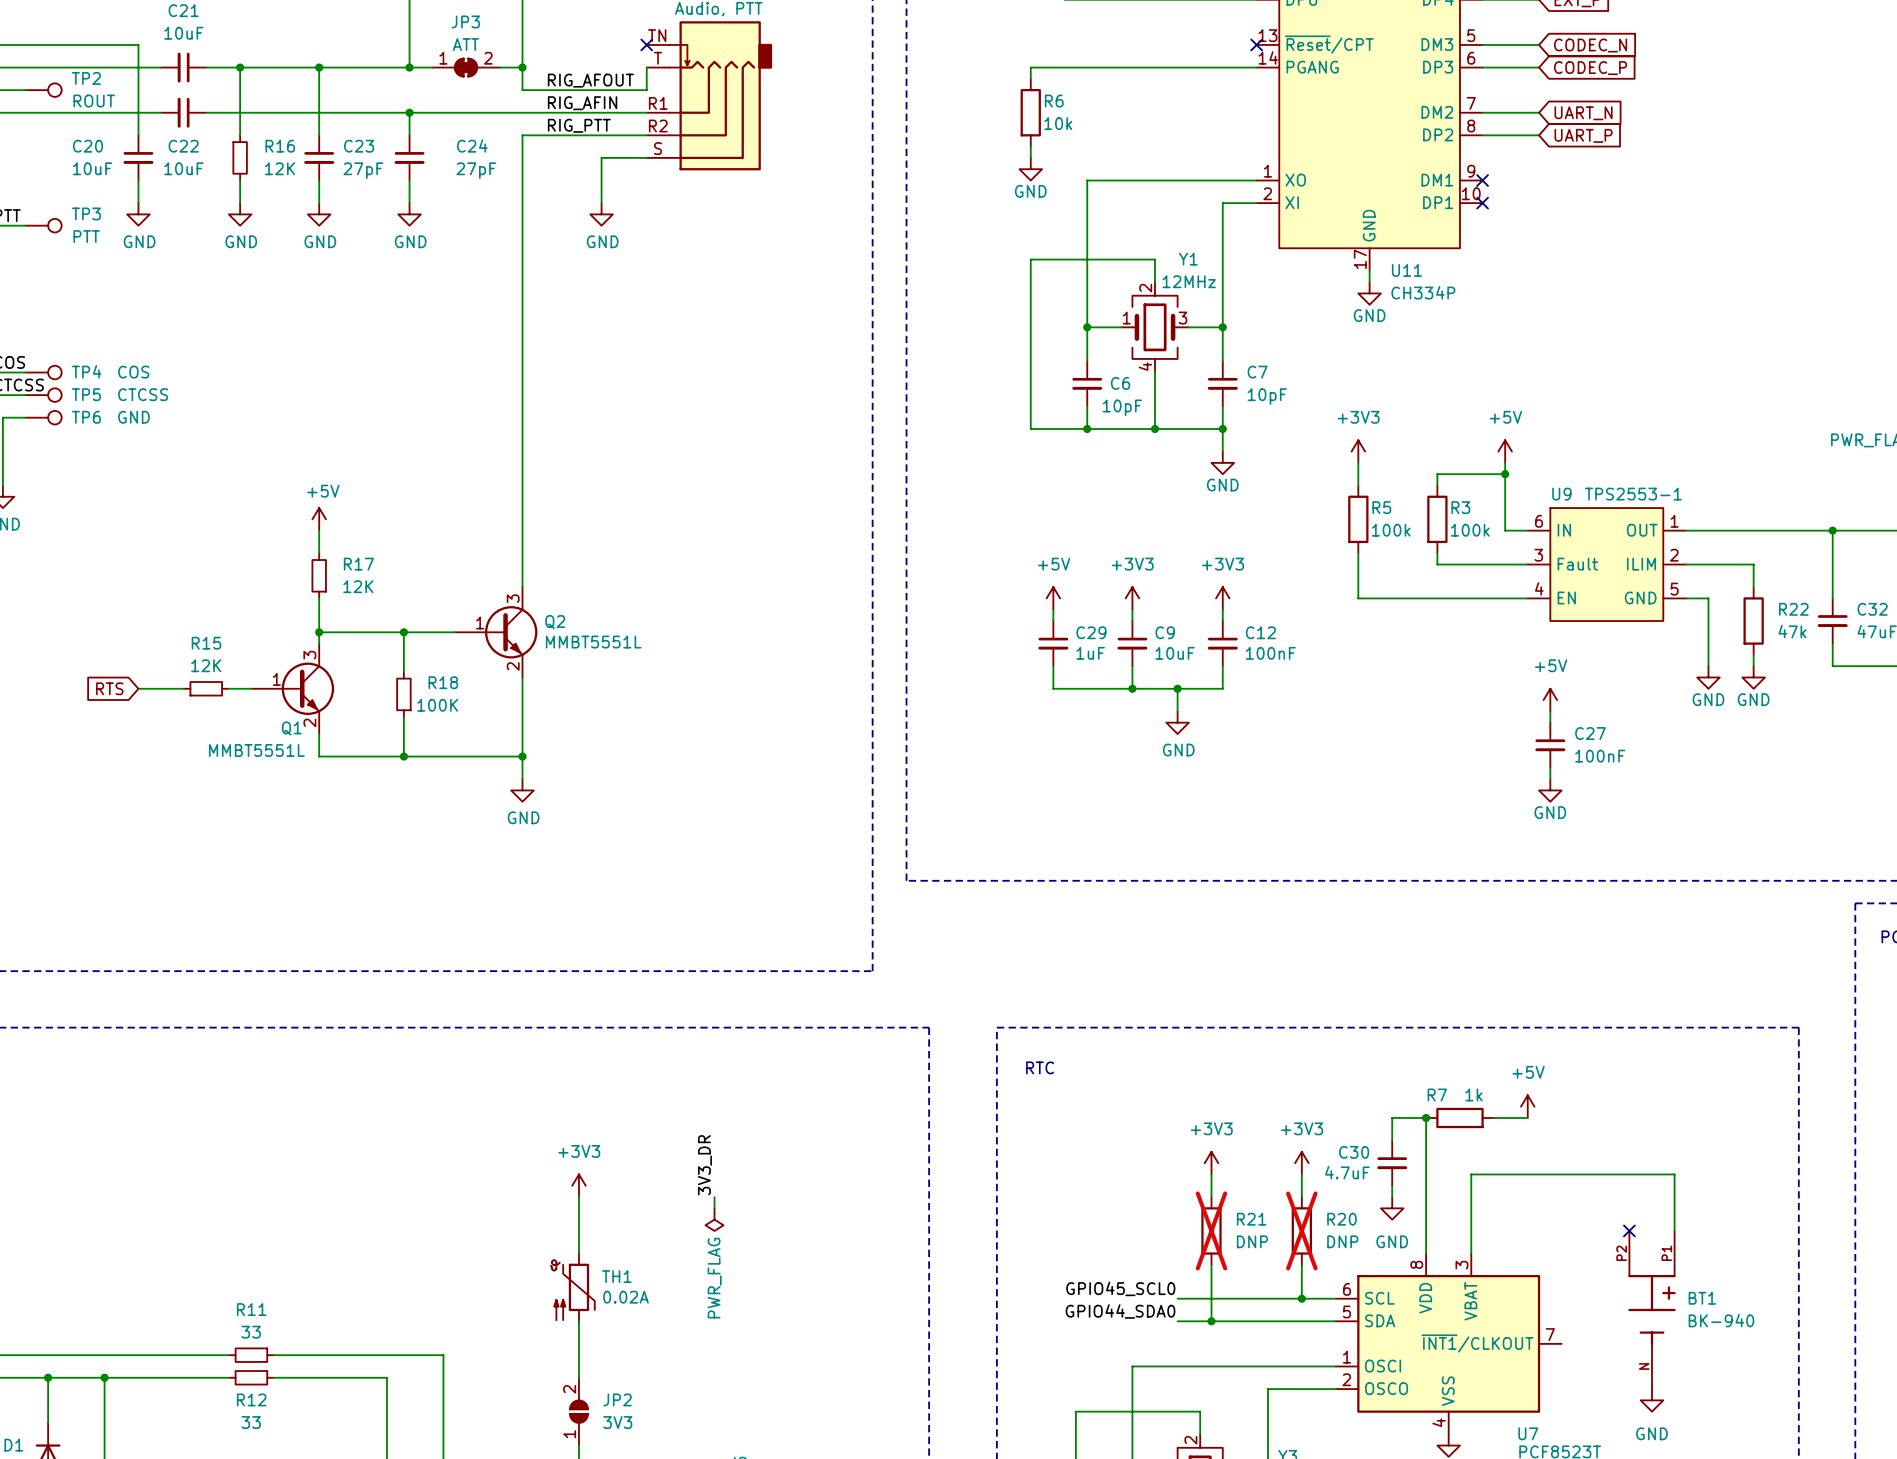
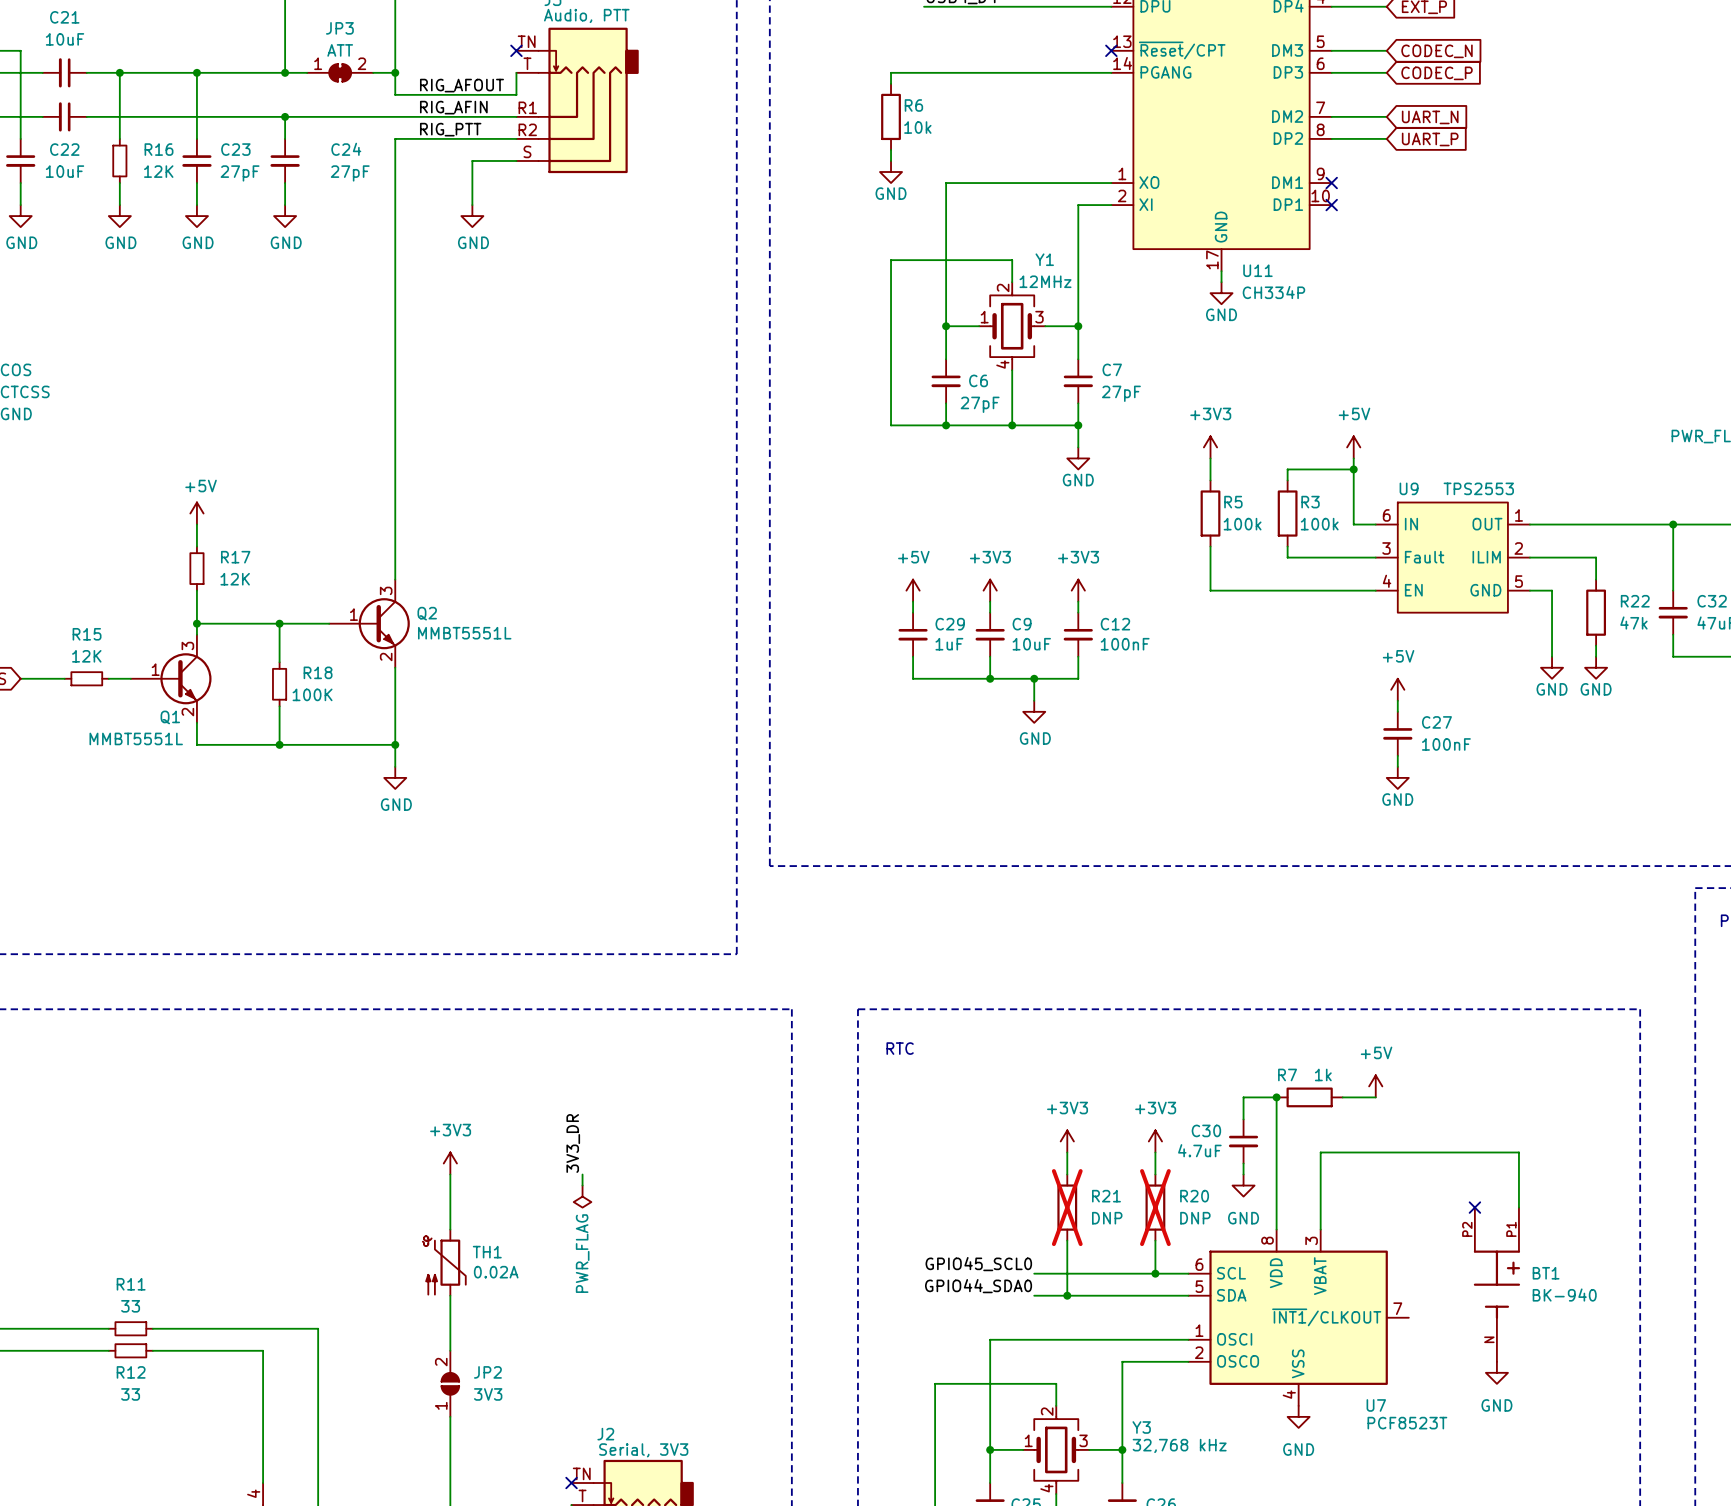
C7 value: 10pF (1267, 396) -> 27pF (1121, 393)
C6 value: 10pF (1122, 407) -> 27pF (980, 404)
U9 value: TPS2553-1 (1633, 494) -> TPS2553 (1478, 488)

